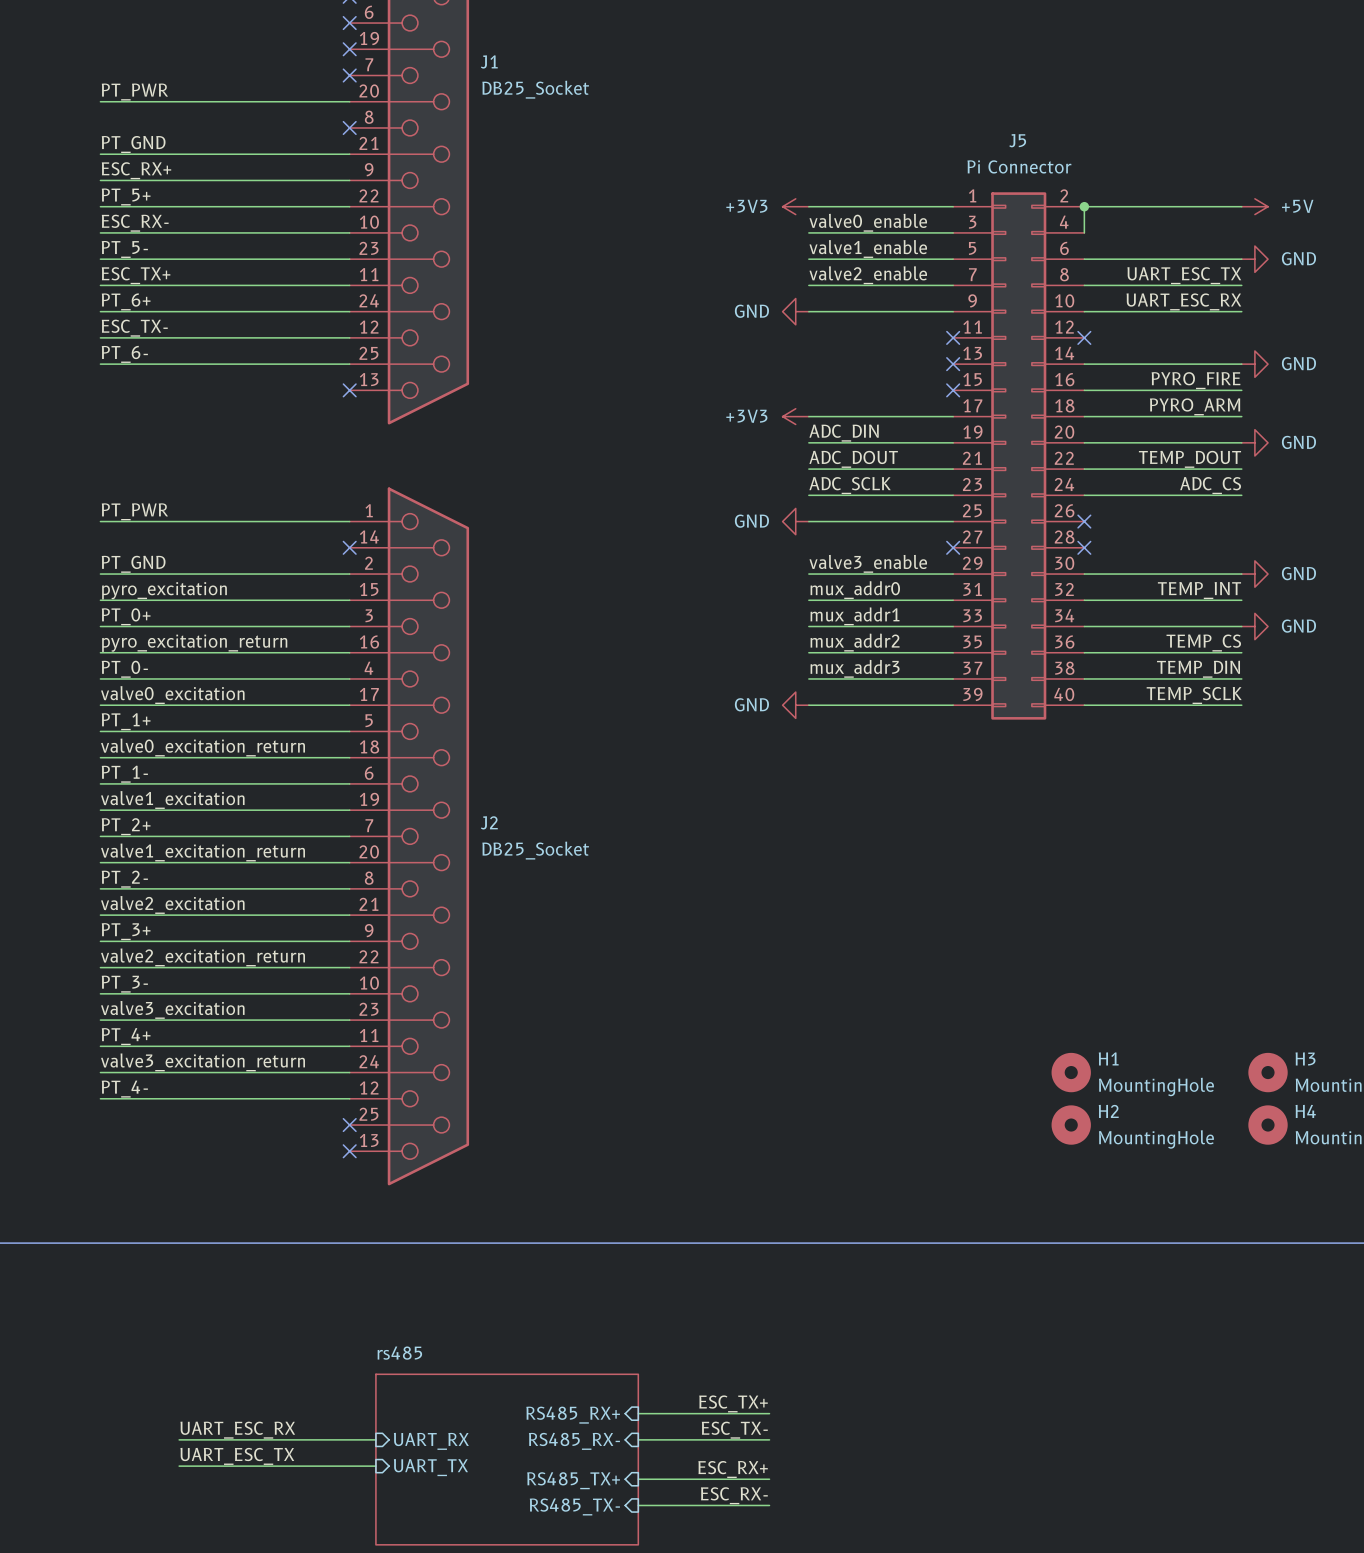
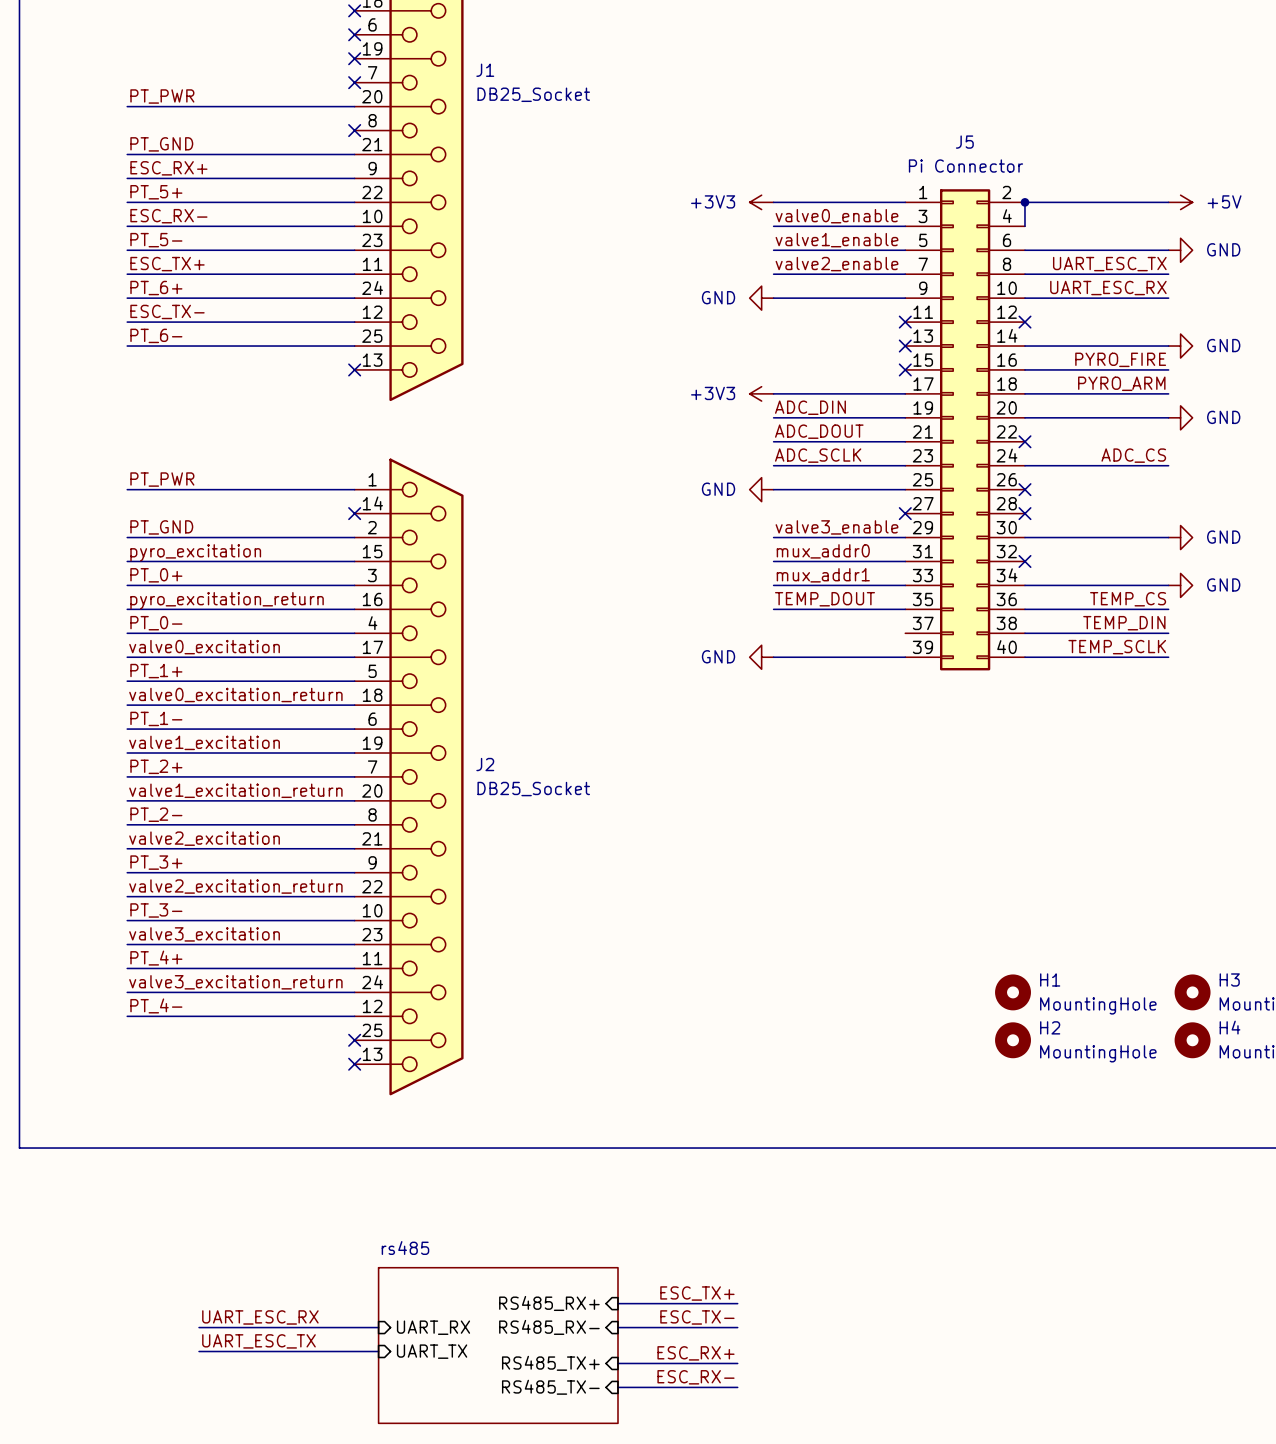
label: TEMP_DOUT (1189, 459) -> none
wire: (1084, 469) (1241, 469) -> none
no-connect mark: none -> (1024, 441)
label: TEMP_INT (1199, 590) -> none
wire: (1084, 600) (1241, 600) -> none
no-connect mark: none -> (1024, 561)
label: mux_addr2 (855, 642) -> TEMP_DOUT (825, 599)
label: mux_addr3 (855, 668) -> none
wire: (808, 678) (953, 678) -> none

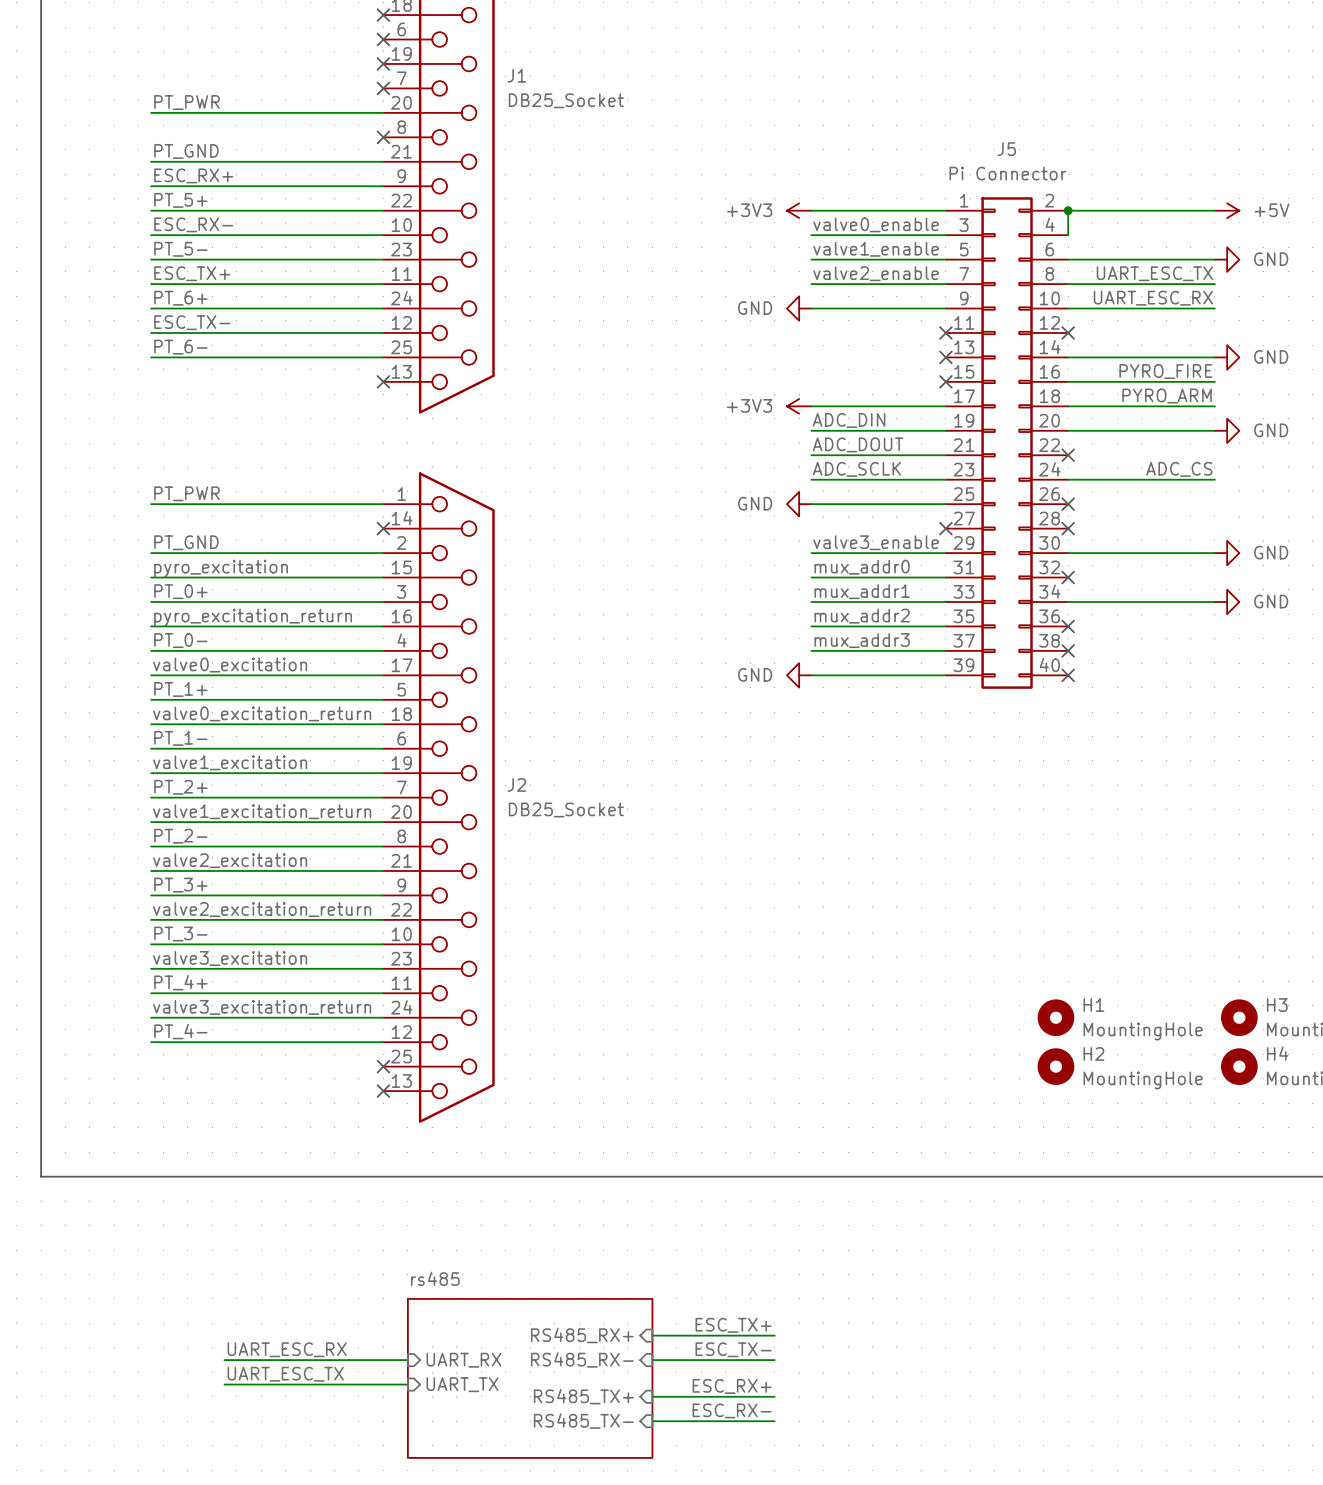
label: TEMP_DOUT (825, 599) -> mux_addr2 (862, 616)
label: TEMP_CS (1128, 599) -> none
wire: (1024, 609) (1168, 609) -> none
no-connect mark: none -> (1068, 626)
label: none -> mux_addr3 (862, 640)
label: TEMP_DIN (1124, 623) -> none
wire: none -> (811, 650) (945, 650)
wire: (1024, 633) (1168, 633) -> none
no-connect mark: none -> (1068, 650)
label: TEMP_SCLK (1117, 647) -> none
wire: (1024, 657) (1168, 657) -> none
no-connect mark: none -> (1068, 675)

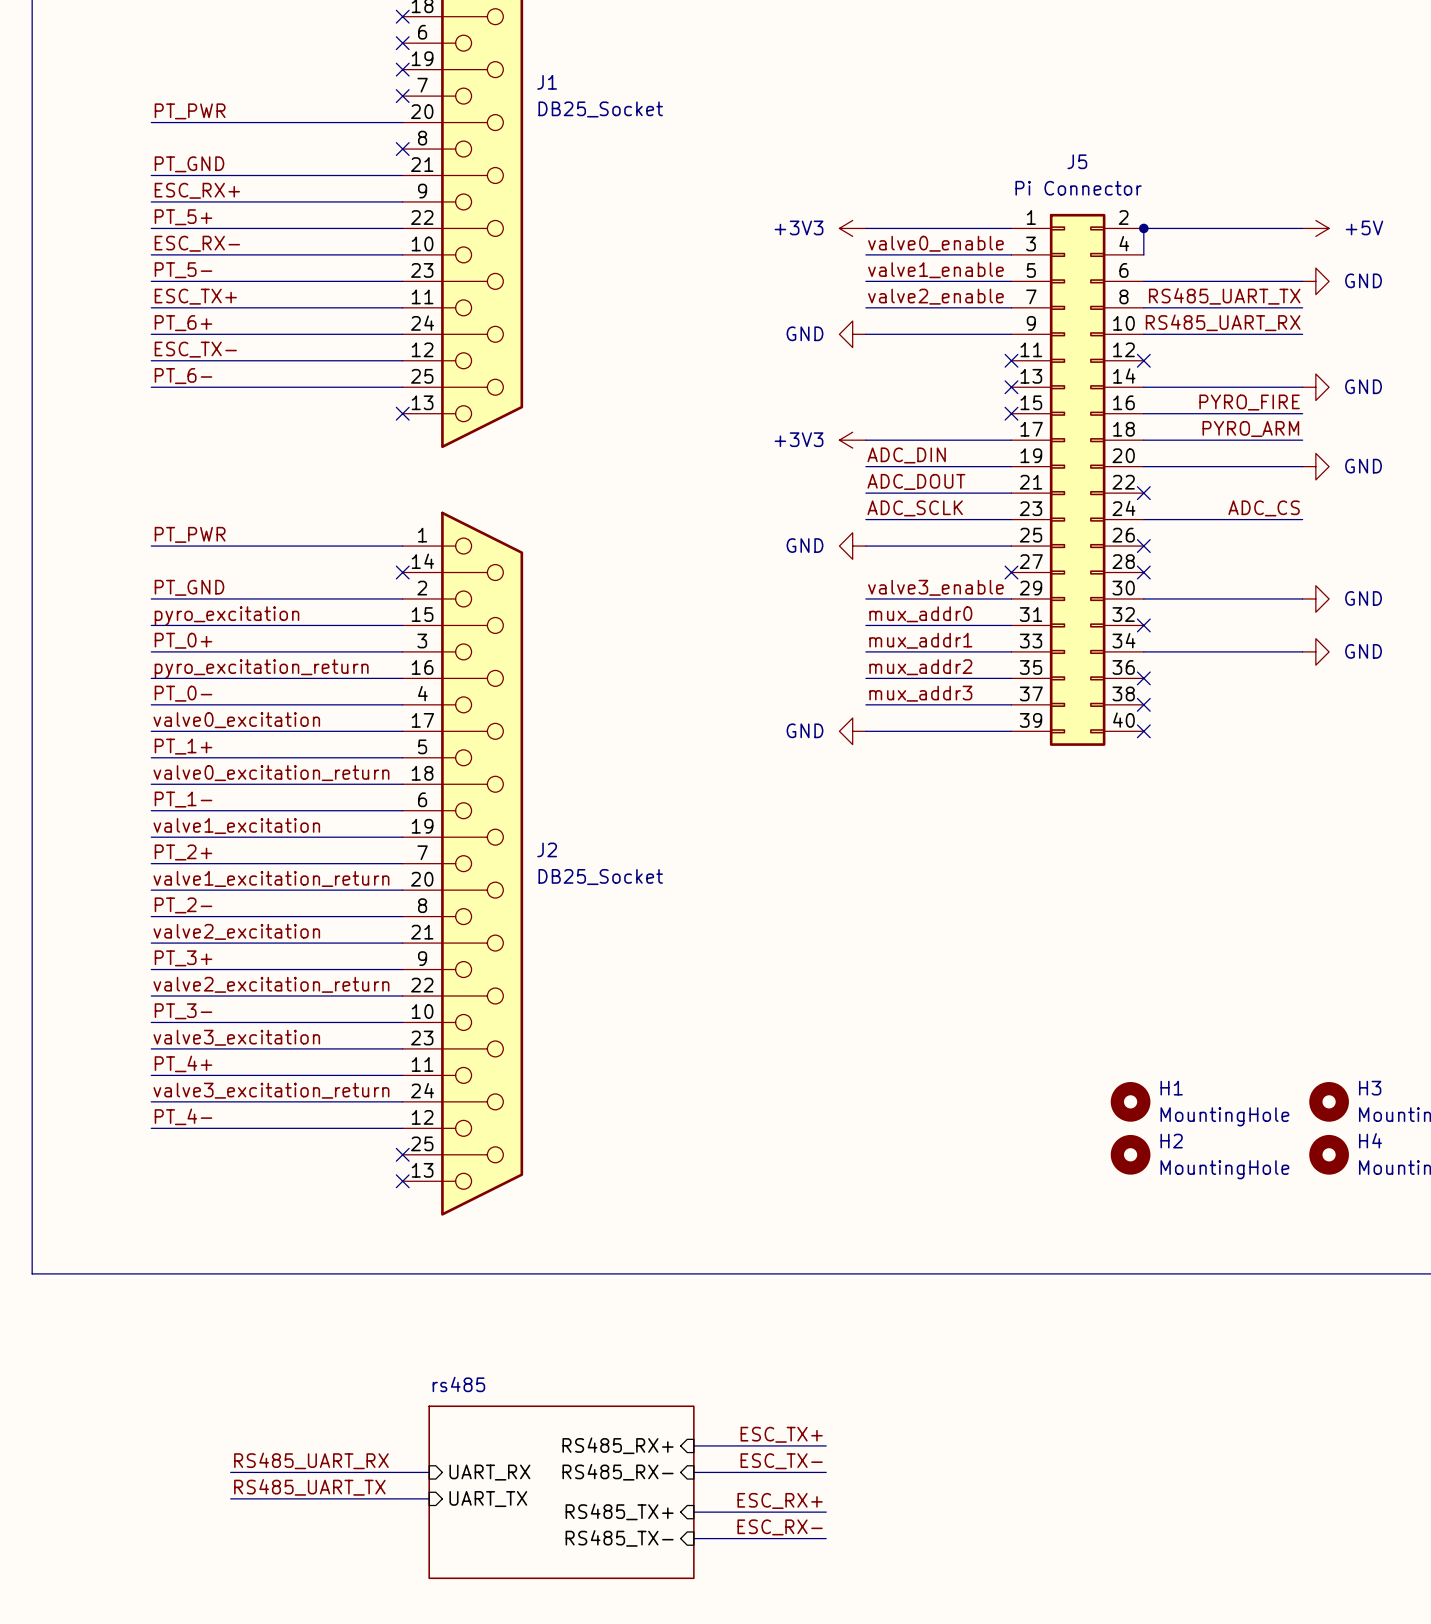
label: UART_ESC_TX (1154, 273) -> RS485_UART_TX (1224, 296)
label: UART_ESC_RX (1153, 298) -> RS485_UART_RX (1223, 322)
label: UART_ESC_RX (287, 1349) -> RS485_UART_RX (311, 1460)
label: UART_ESC_TX (285, 1374) -> RS485_UART_TX (309, 1487)

